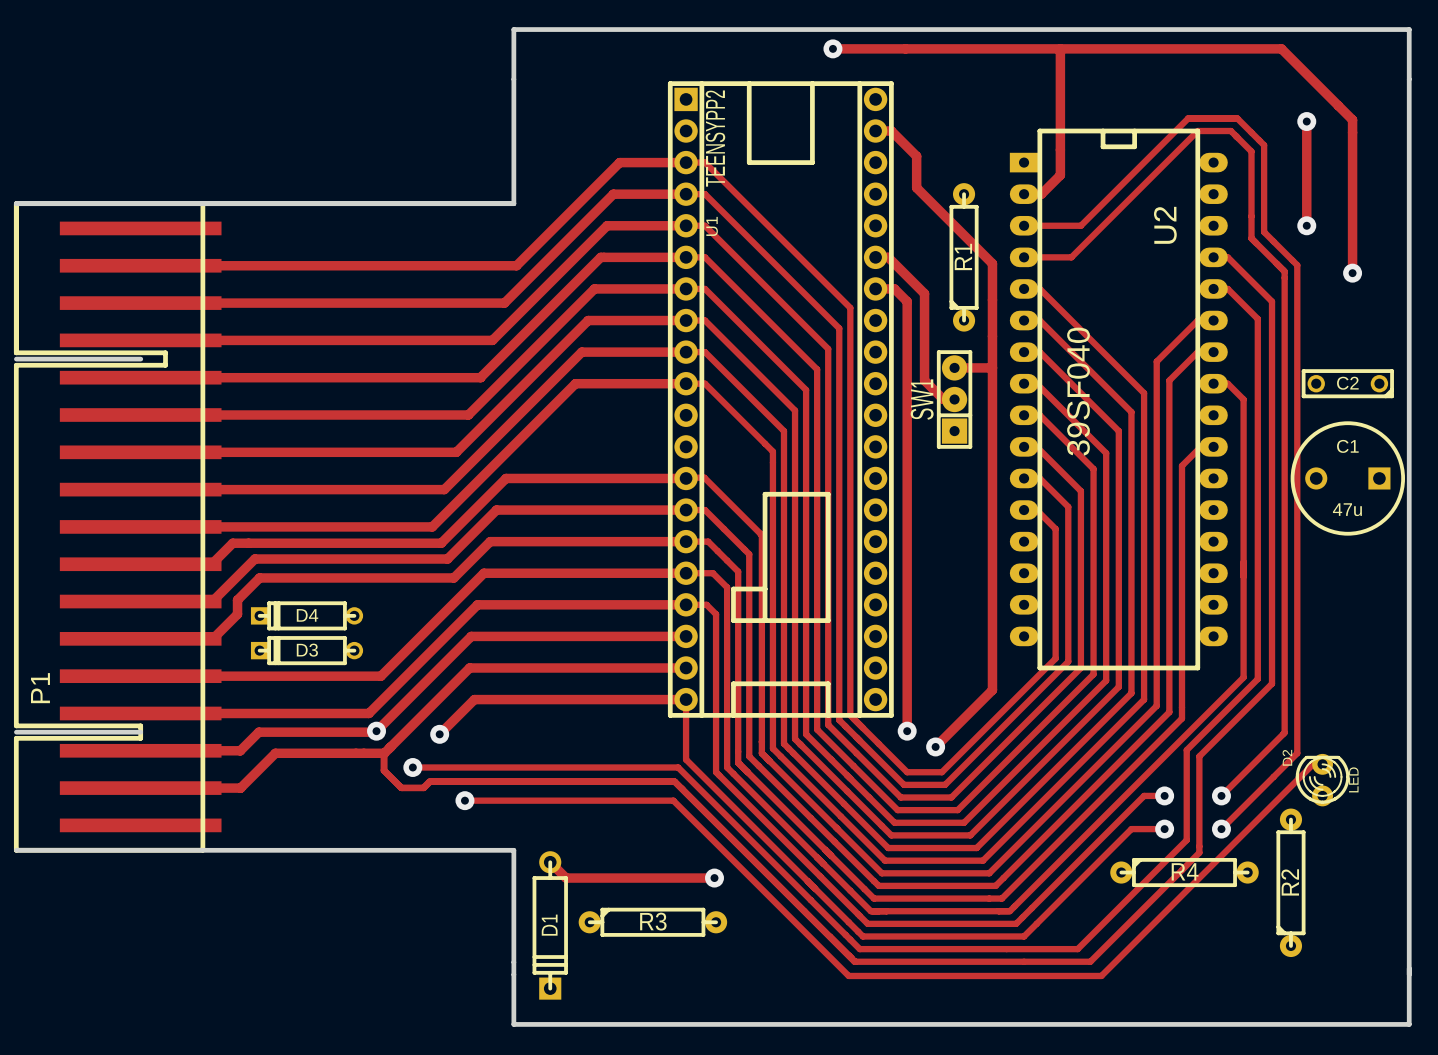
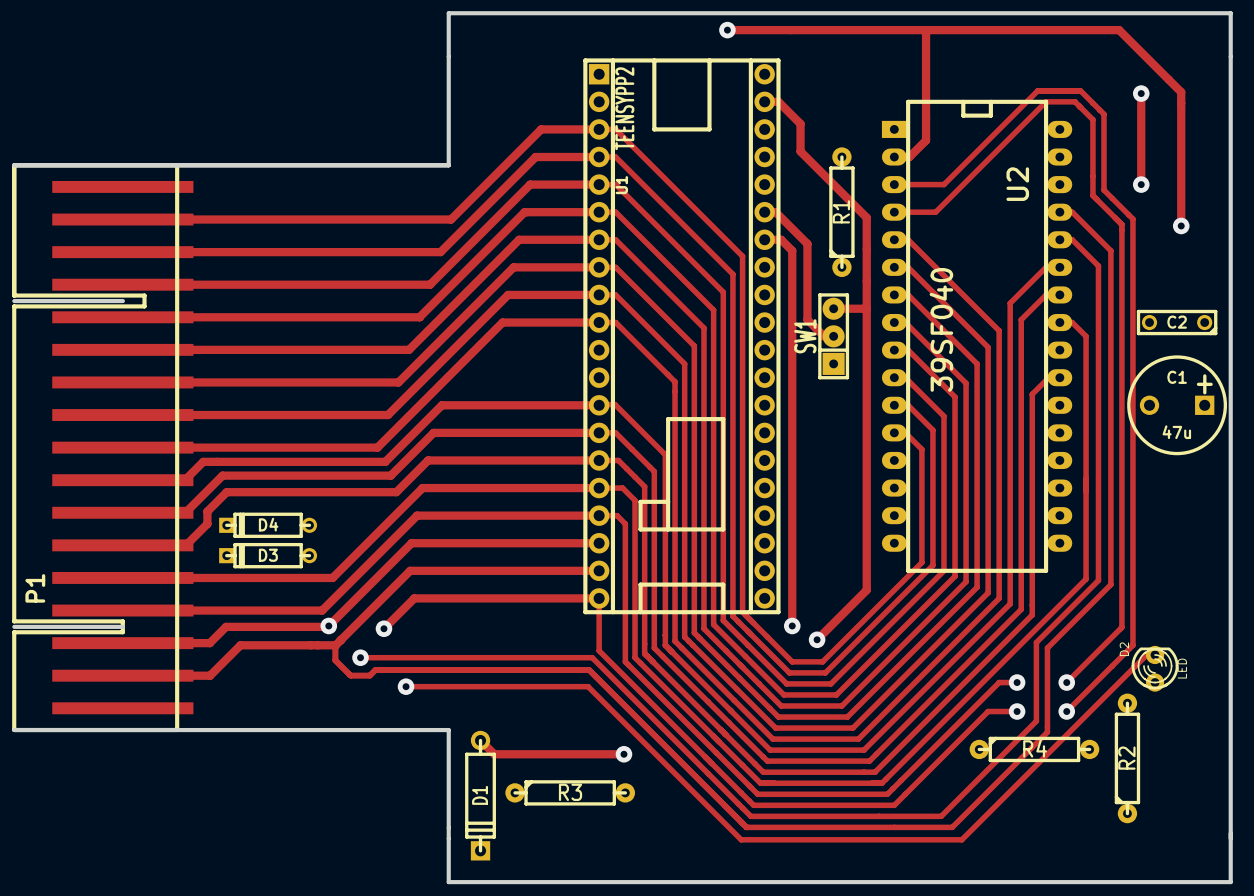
text: none -> + (1204, 384)

